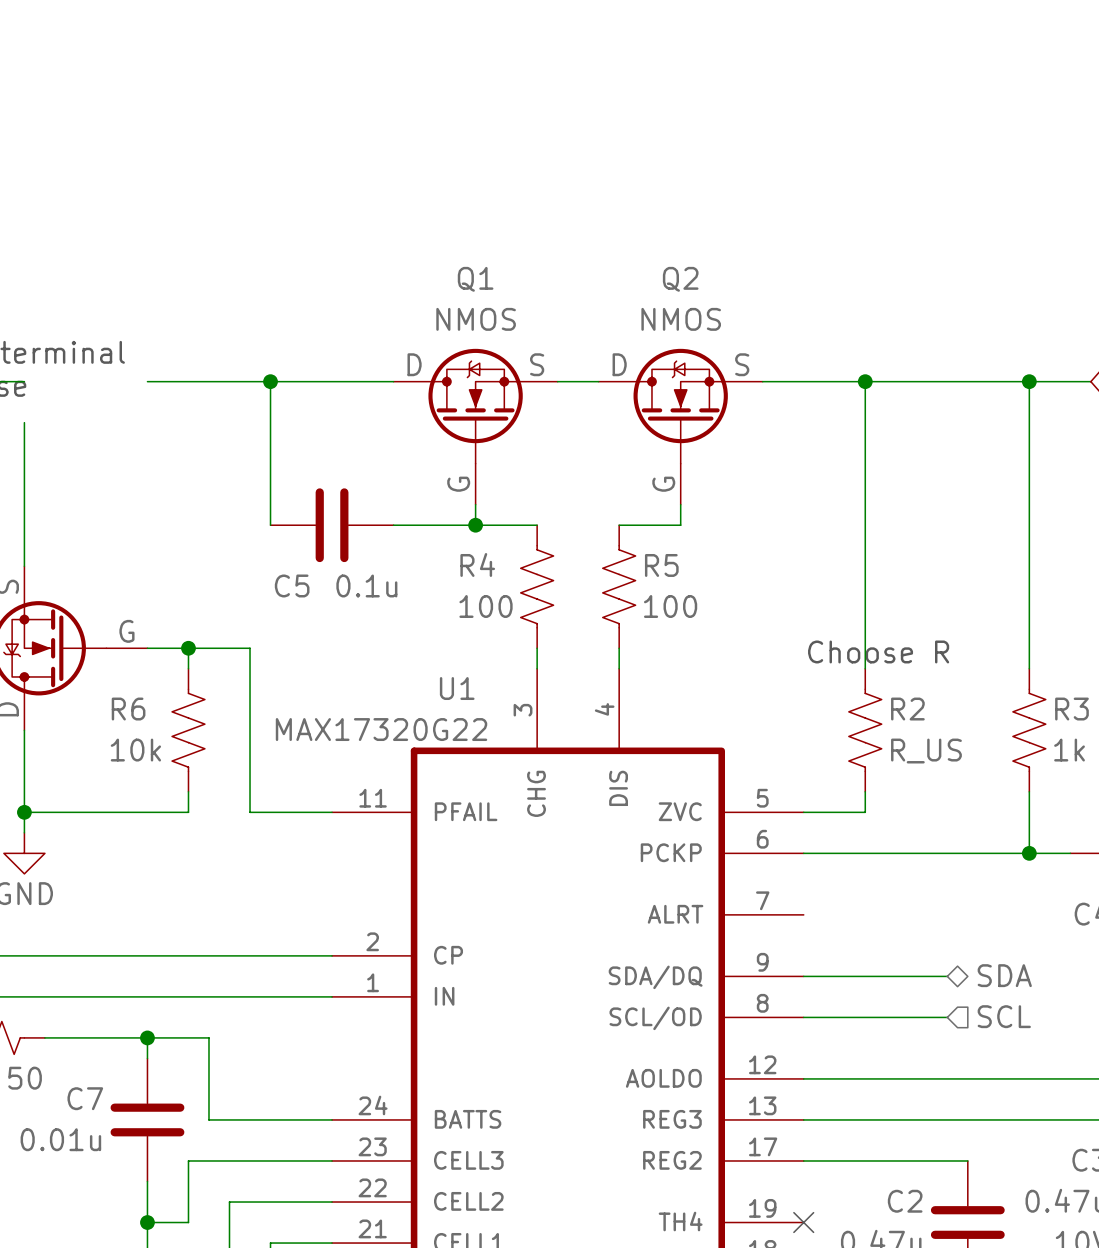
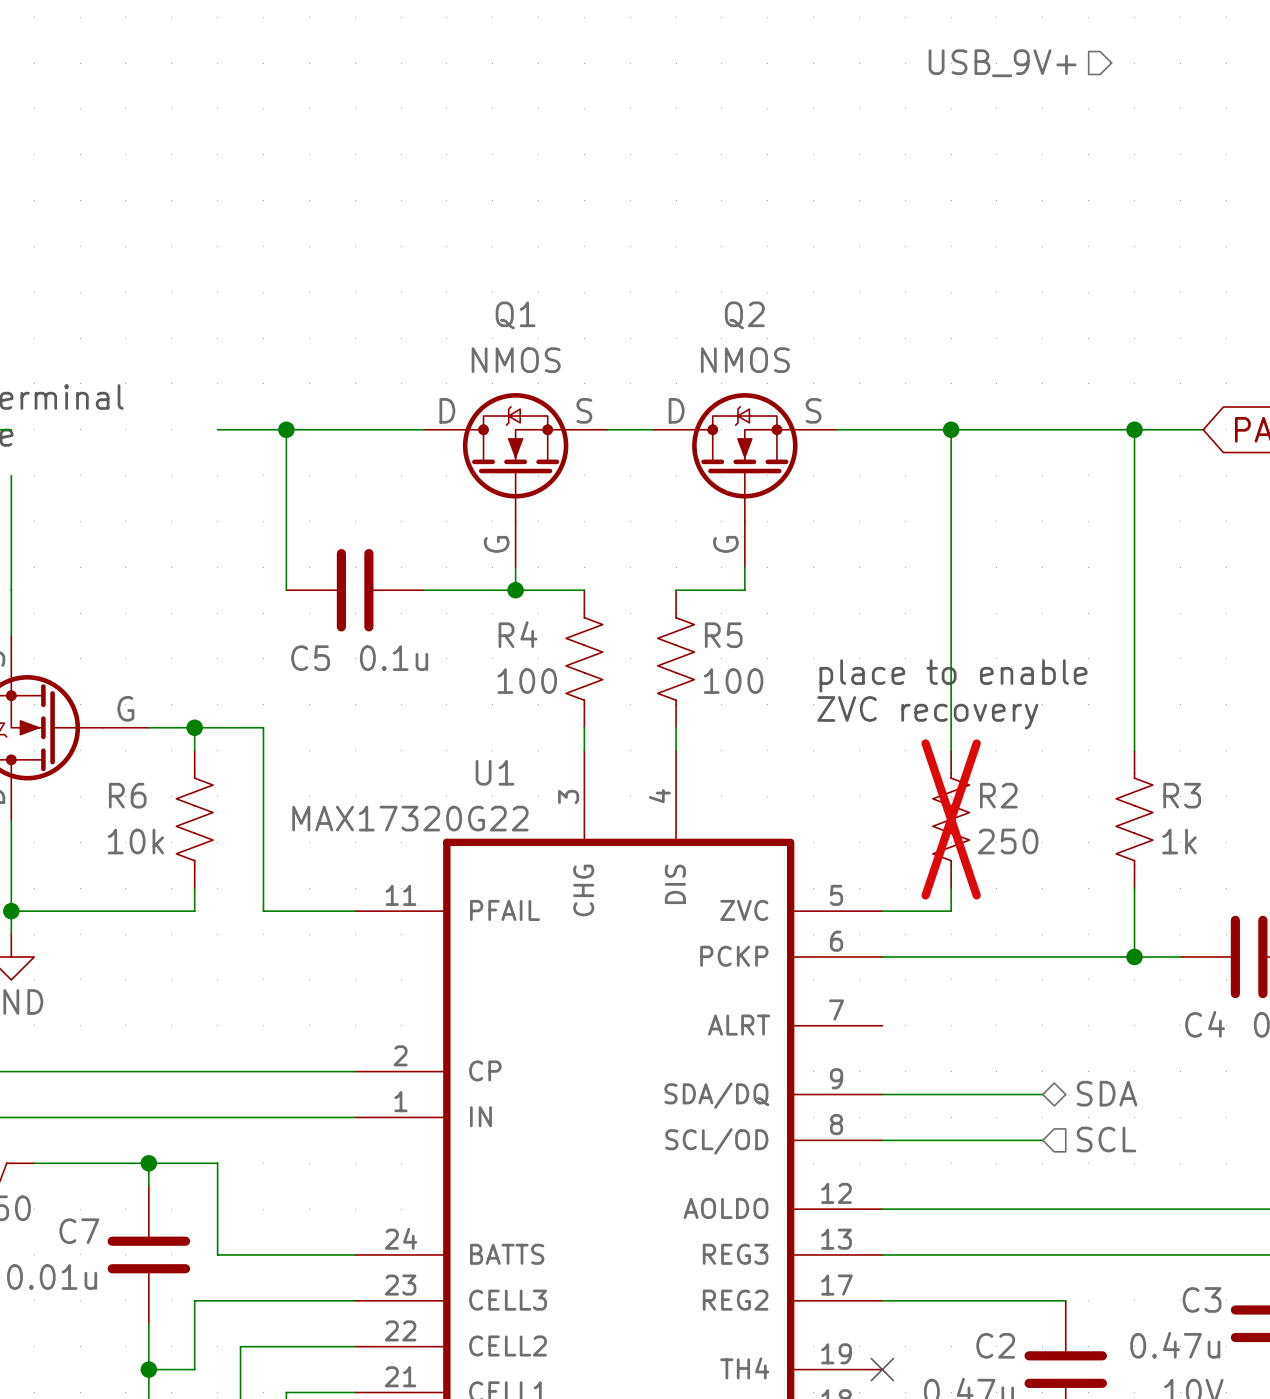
hierarchical label: none -> USB_9V+ (1002, 63)
wire: (147, 381) (208, 381) -> none
text: none -> place to enable (953, 675)
text: none -> ZVC recovery (927, 712)
text: Choose R (878, 651) -> none
R2 do-not-place cross: none -> (951, 819)
R2 value: R_US (926, 751) -> 250 (1008, 841)

